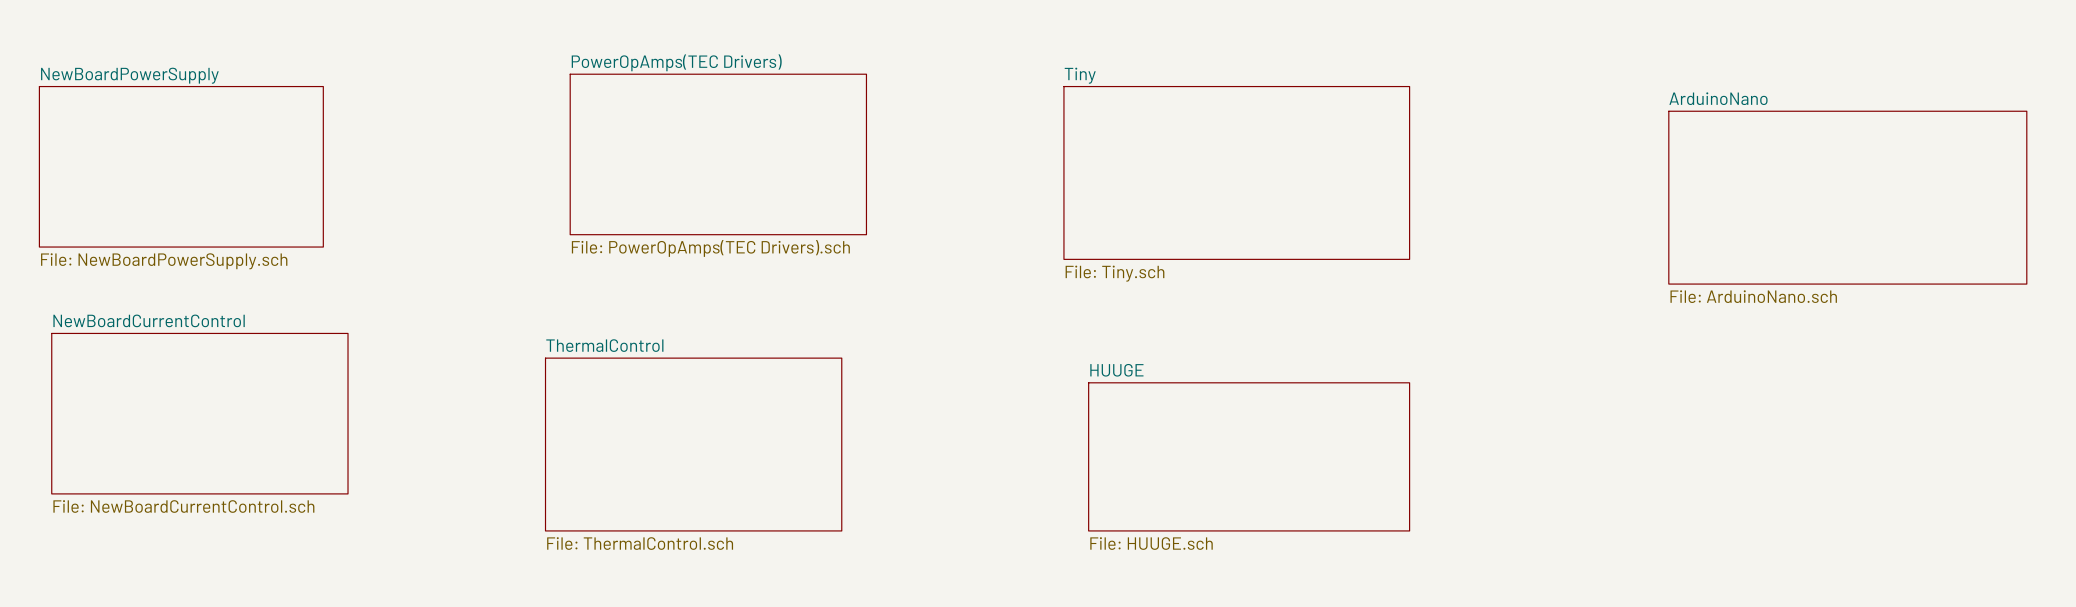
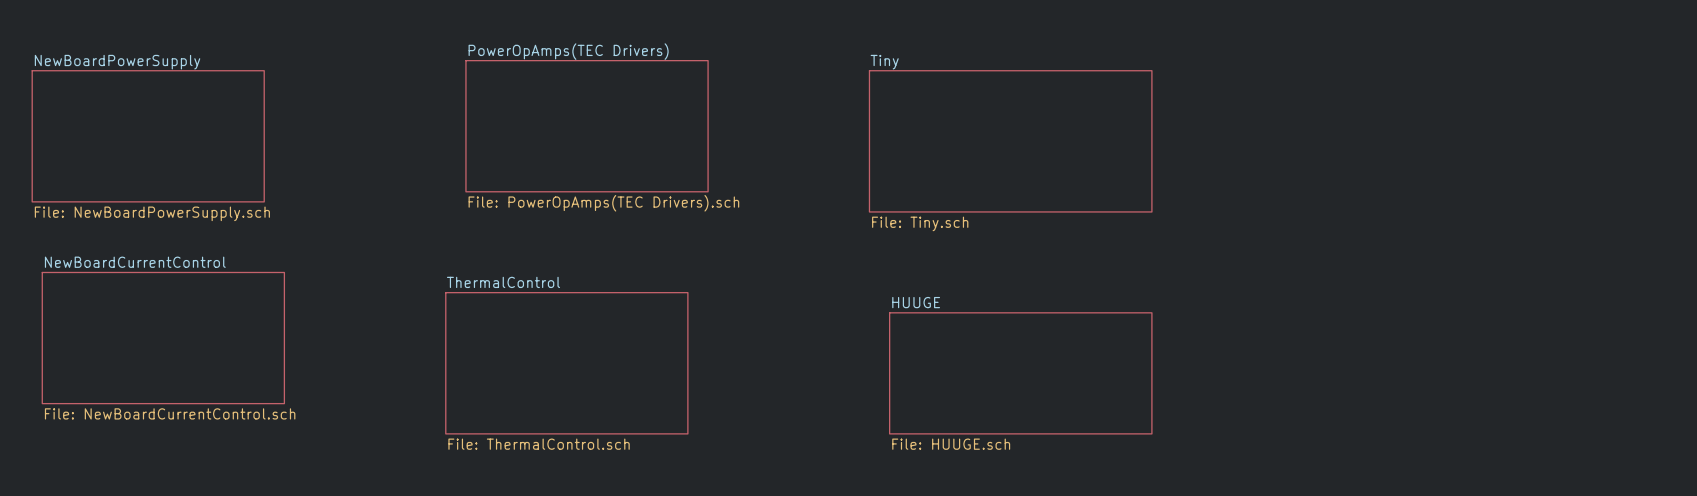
sheet ArduinoNano: File: ArduinoNano.sch (1847, 197) -> none

